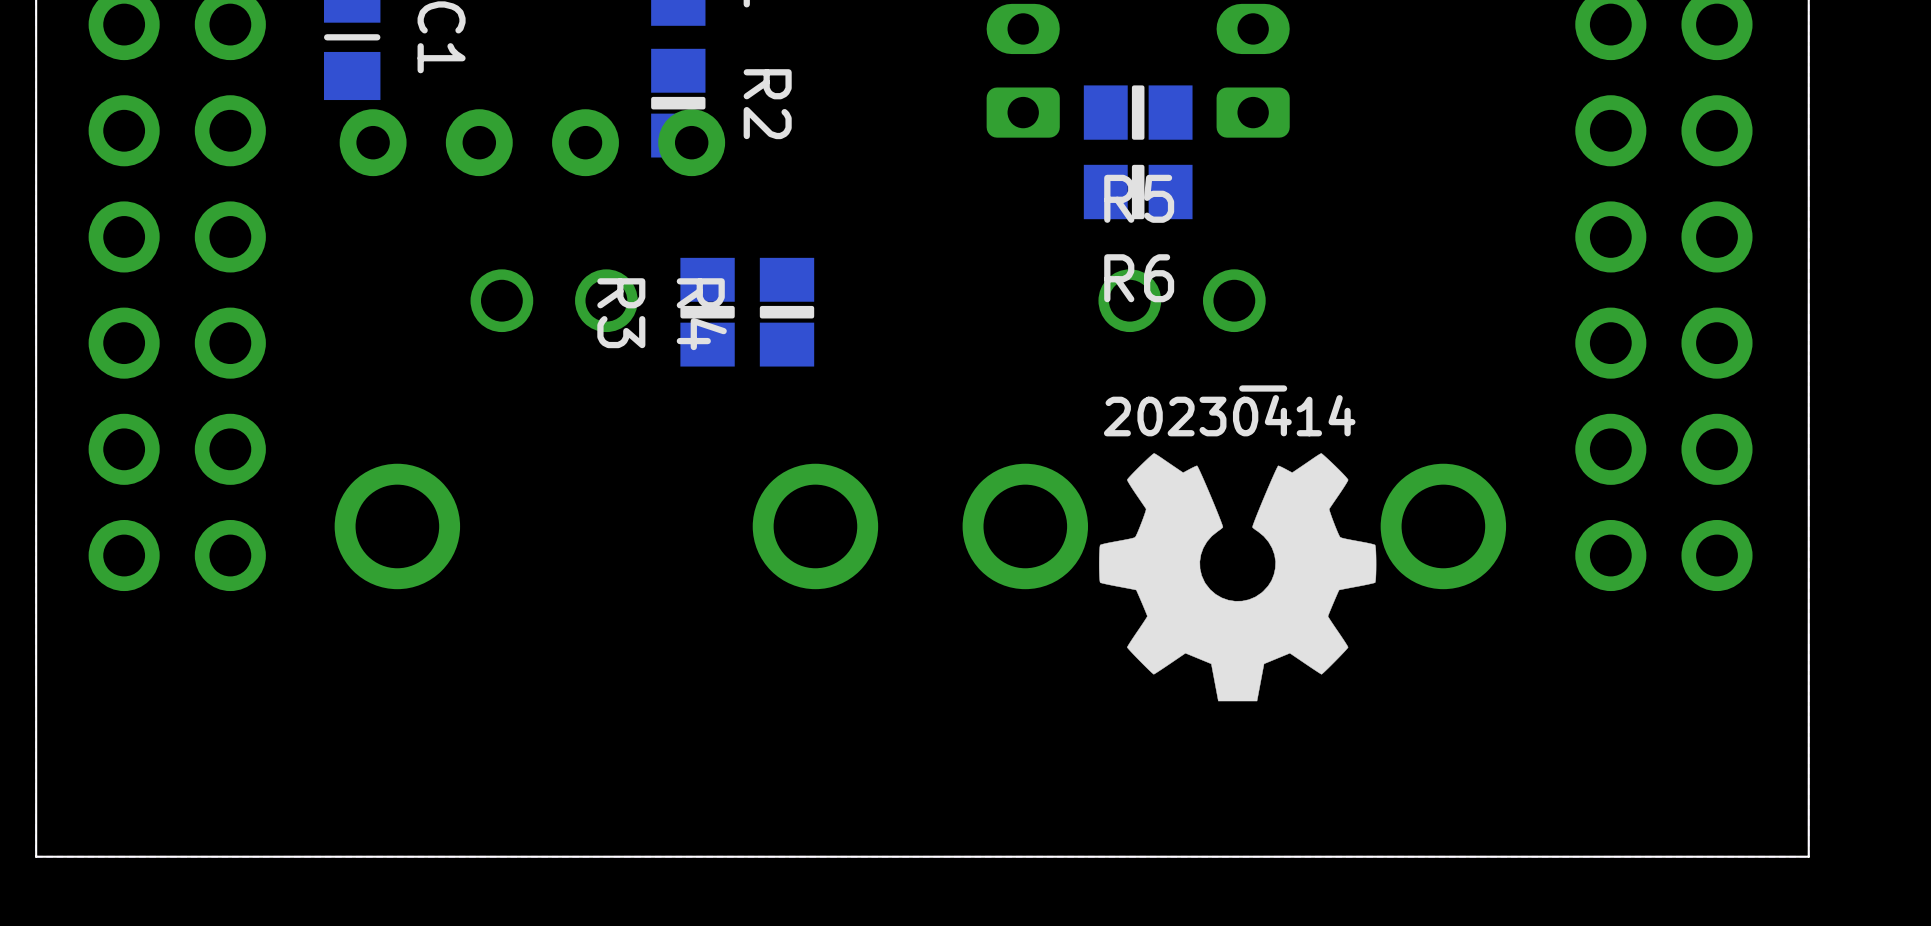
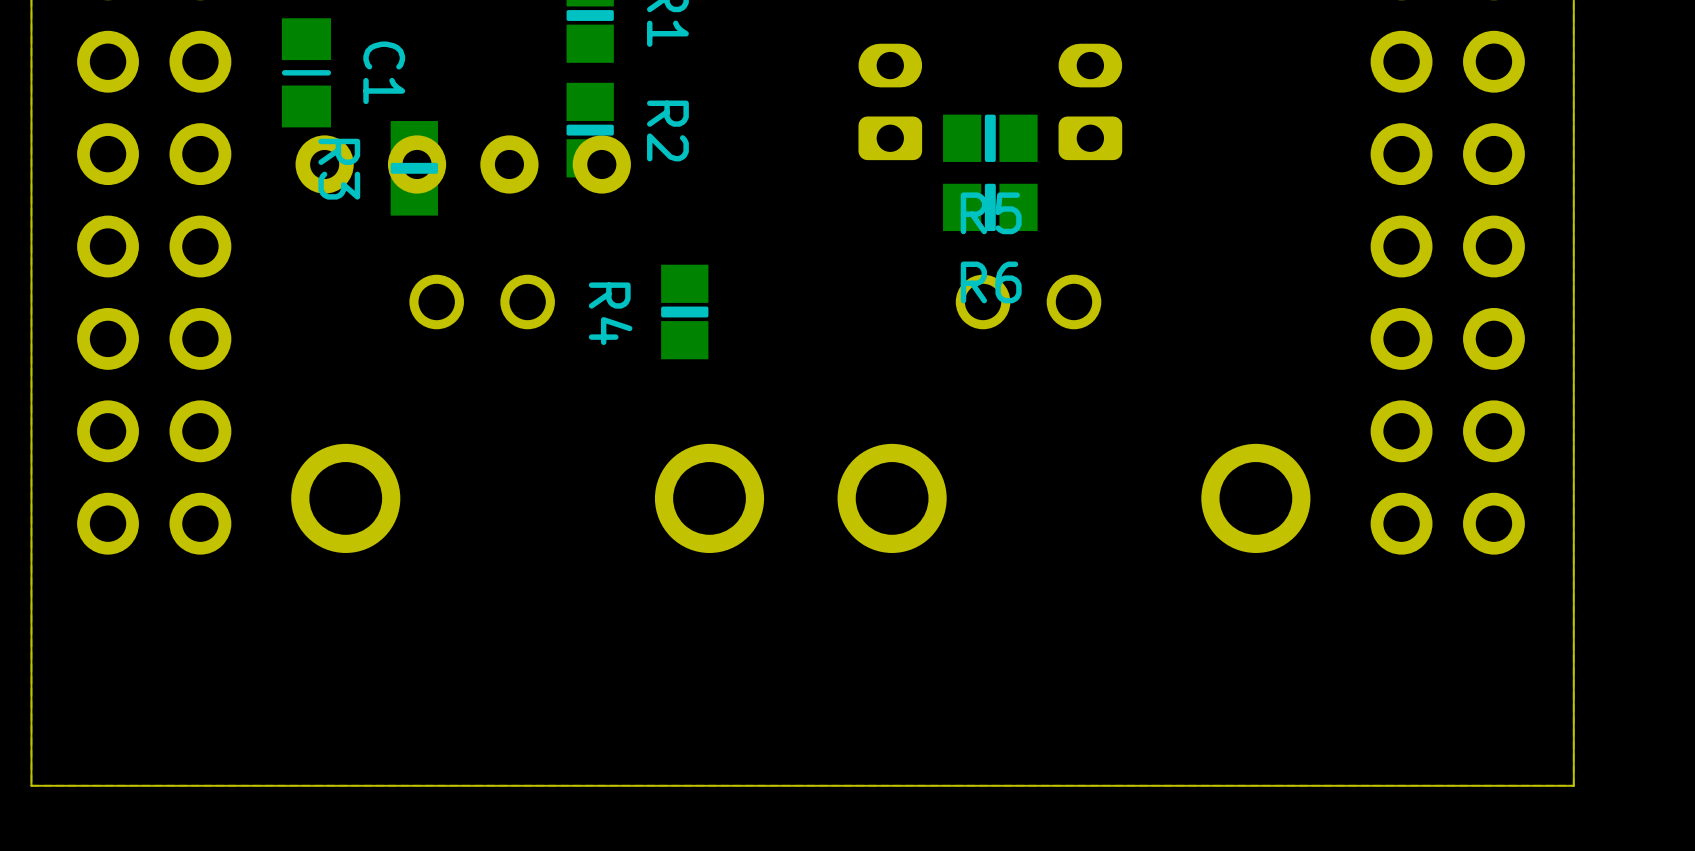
R3 position: (707, 312) -> (414, 168)
drawing: [1099, 385, 1377, 702] -> none

